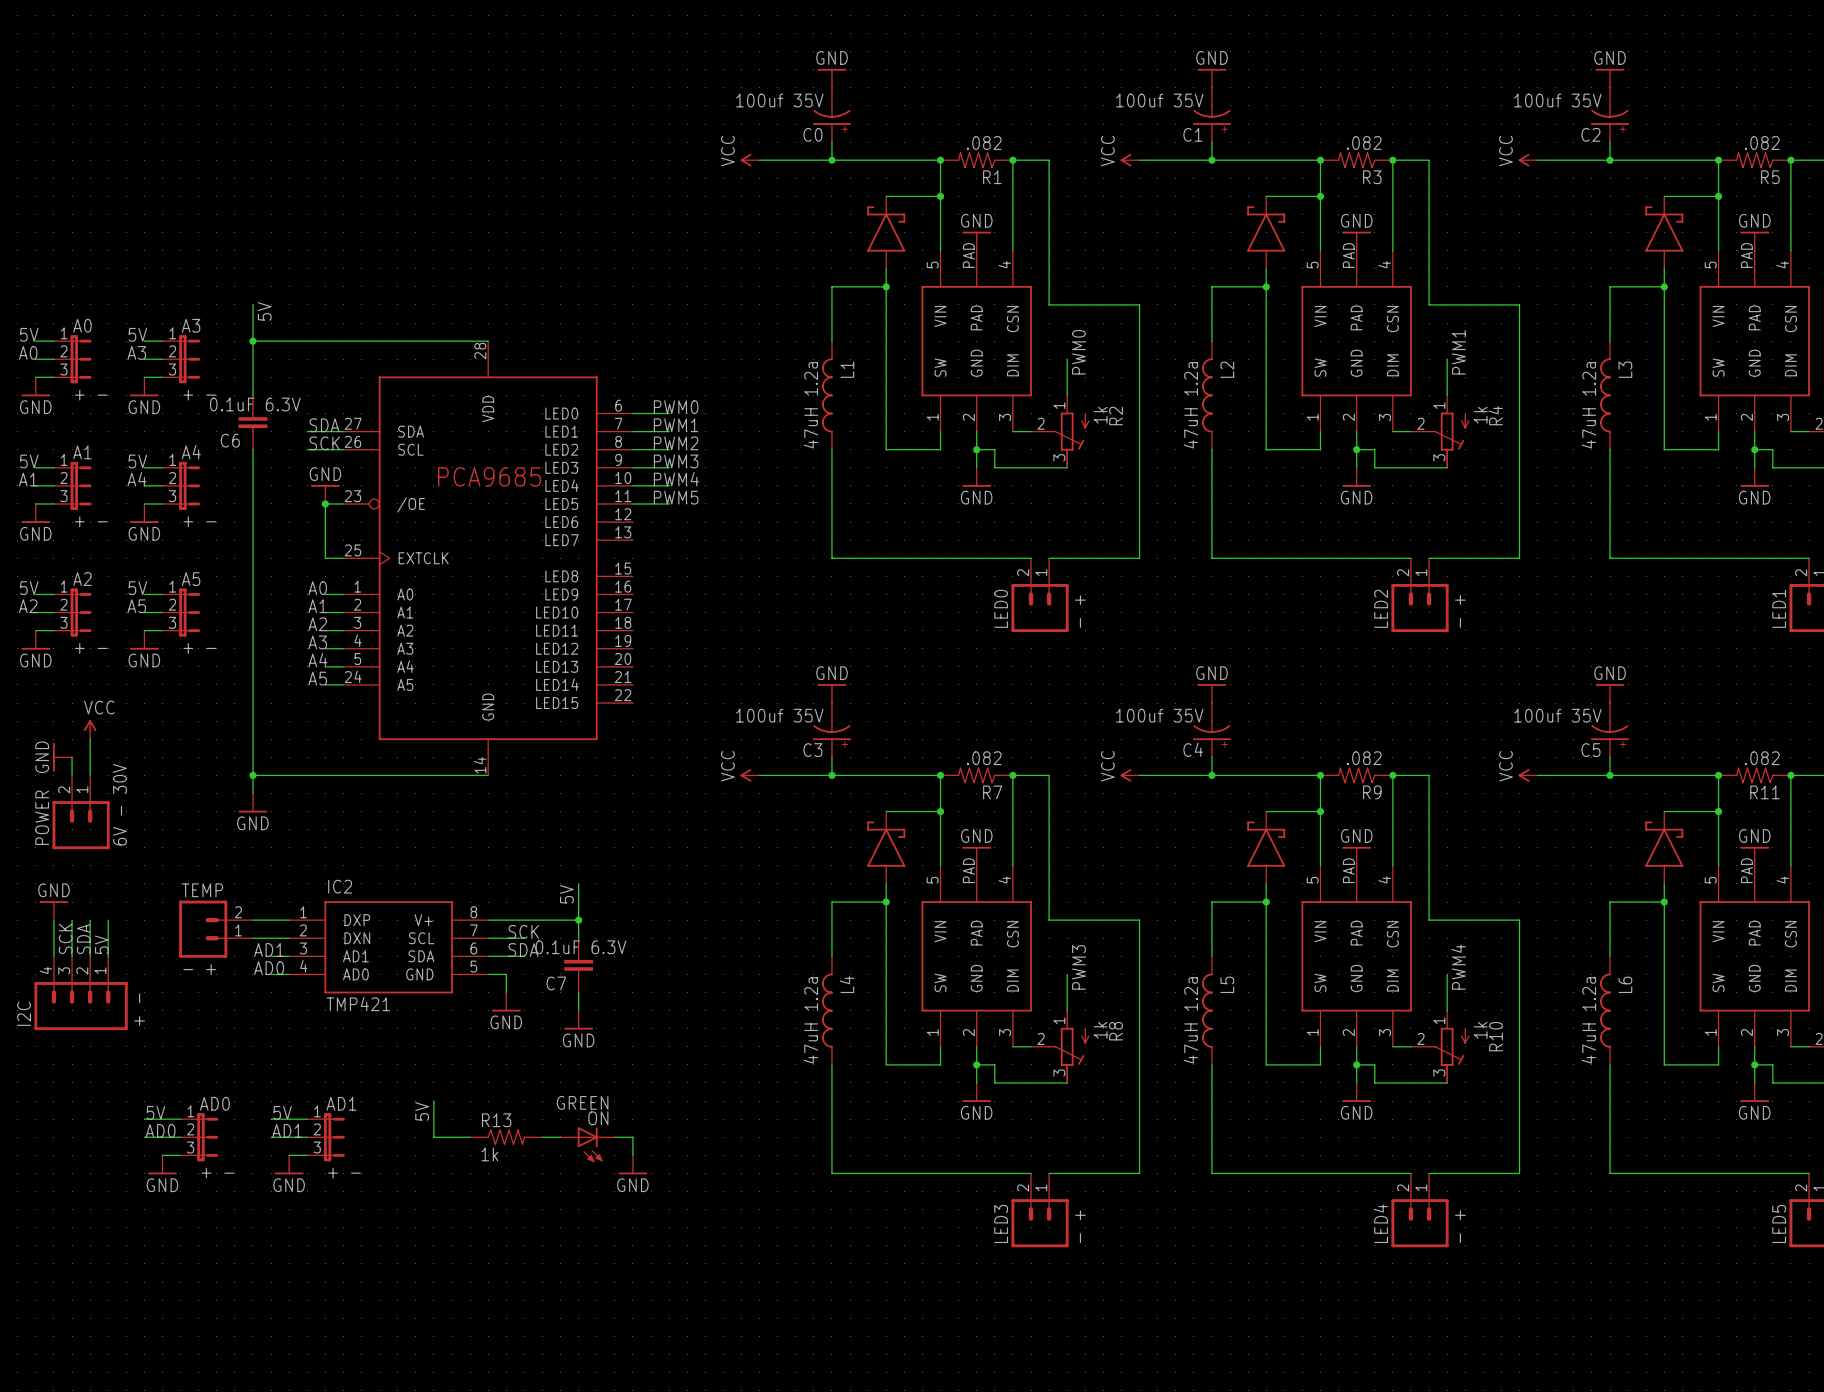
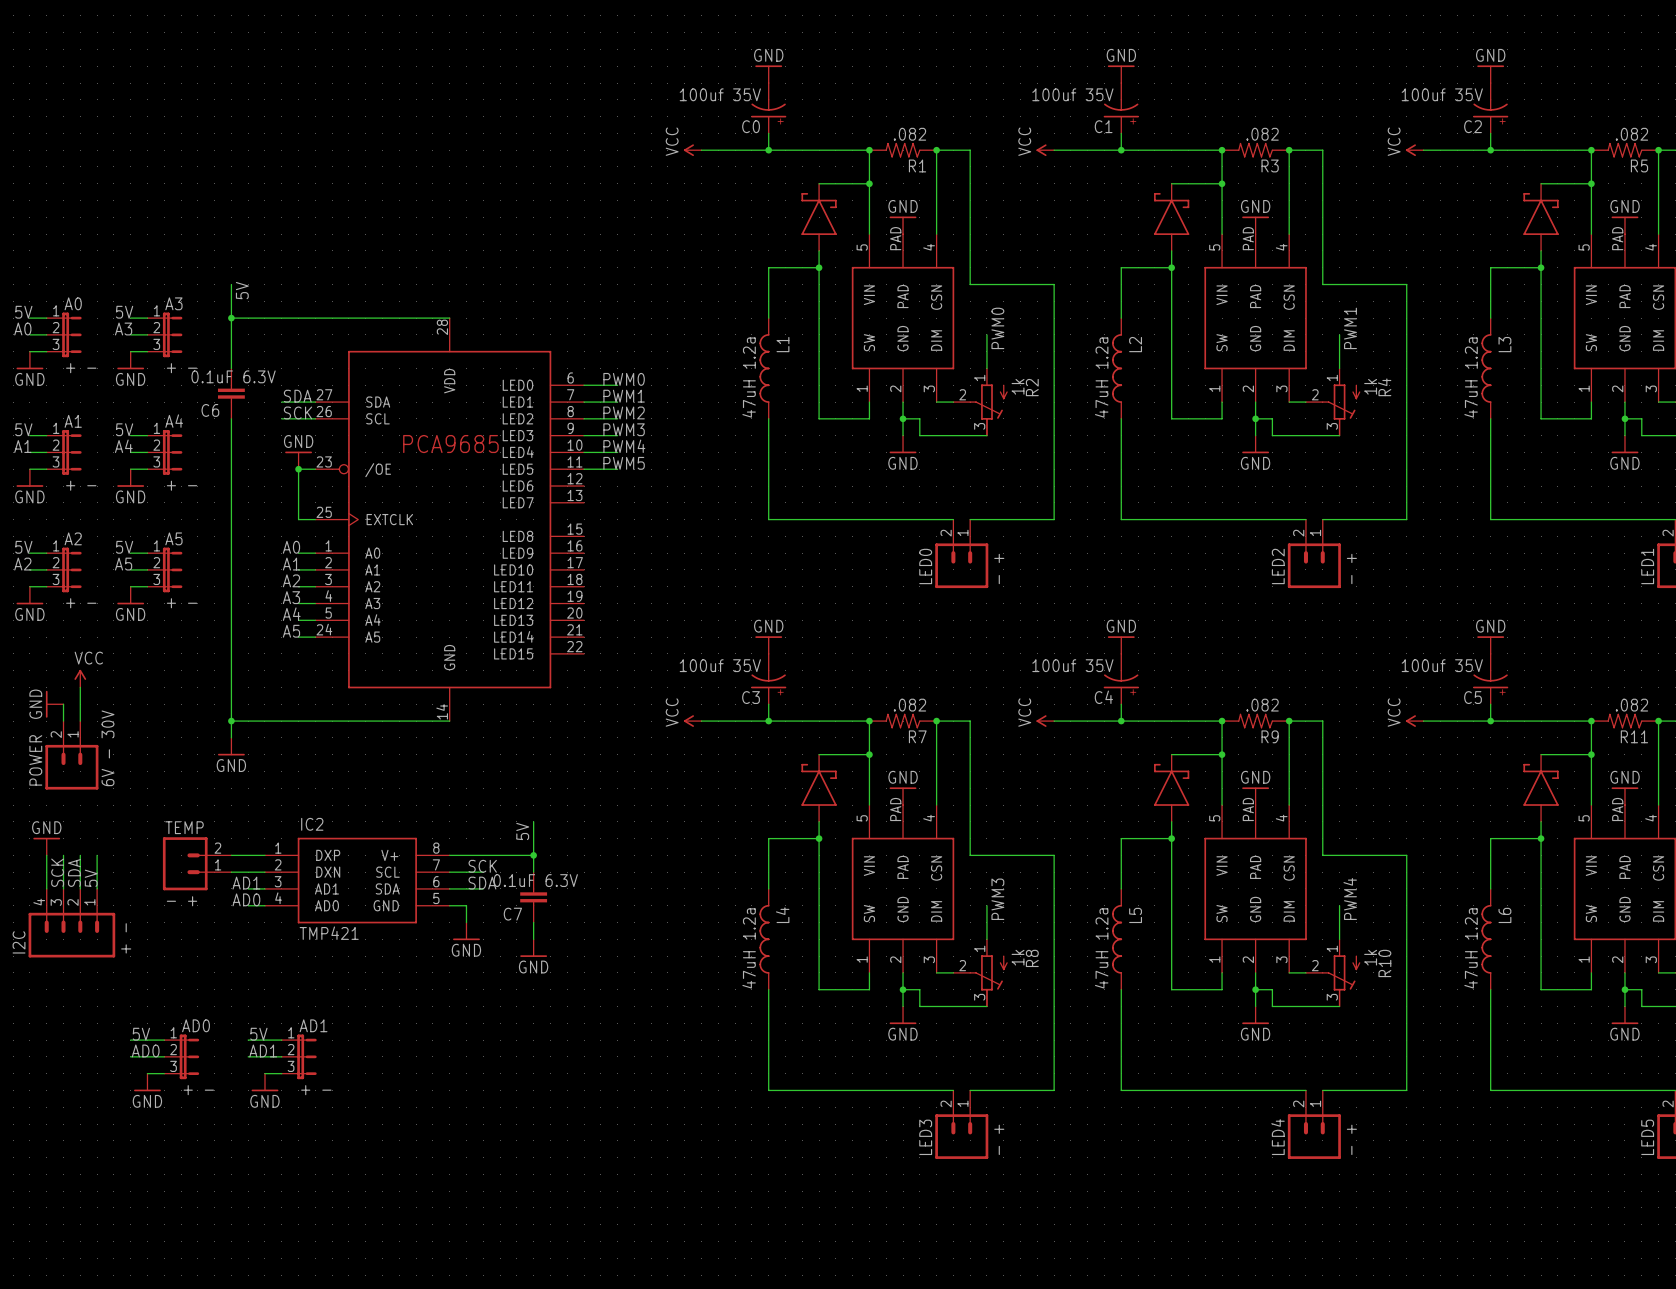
wire: (433, 1101) (433, 1137) (470, 1137) -> none
label: 5V (422, 1111) -> none
R13: 1k (506, 1137) -> none
wire: (542, 1137) (560, 1137) -> none
wire: (614, 1137) (632, 1137) (632, 1155) -> none
ON: GREEN (587, 1144) -> none
power symbol: GND (632, 1164) -> none

